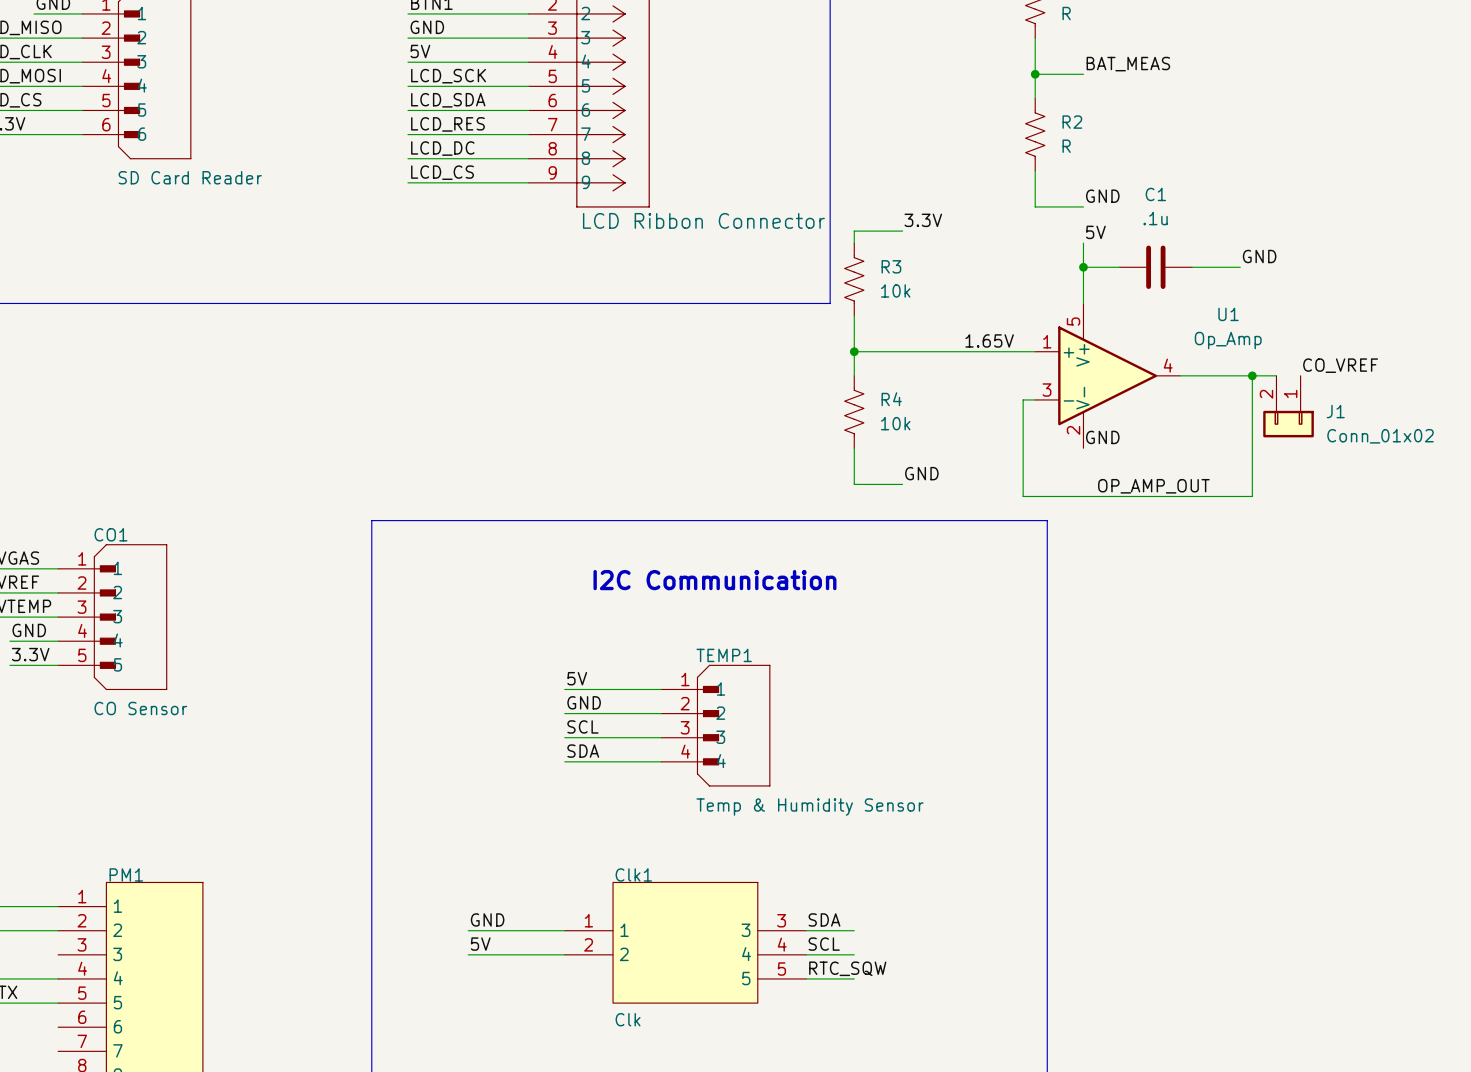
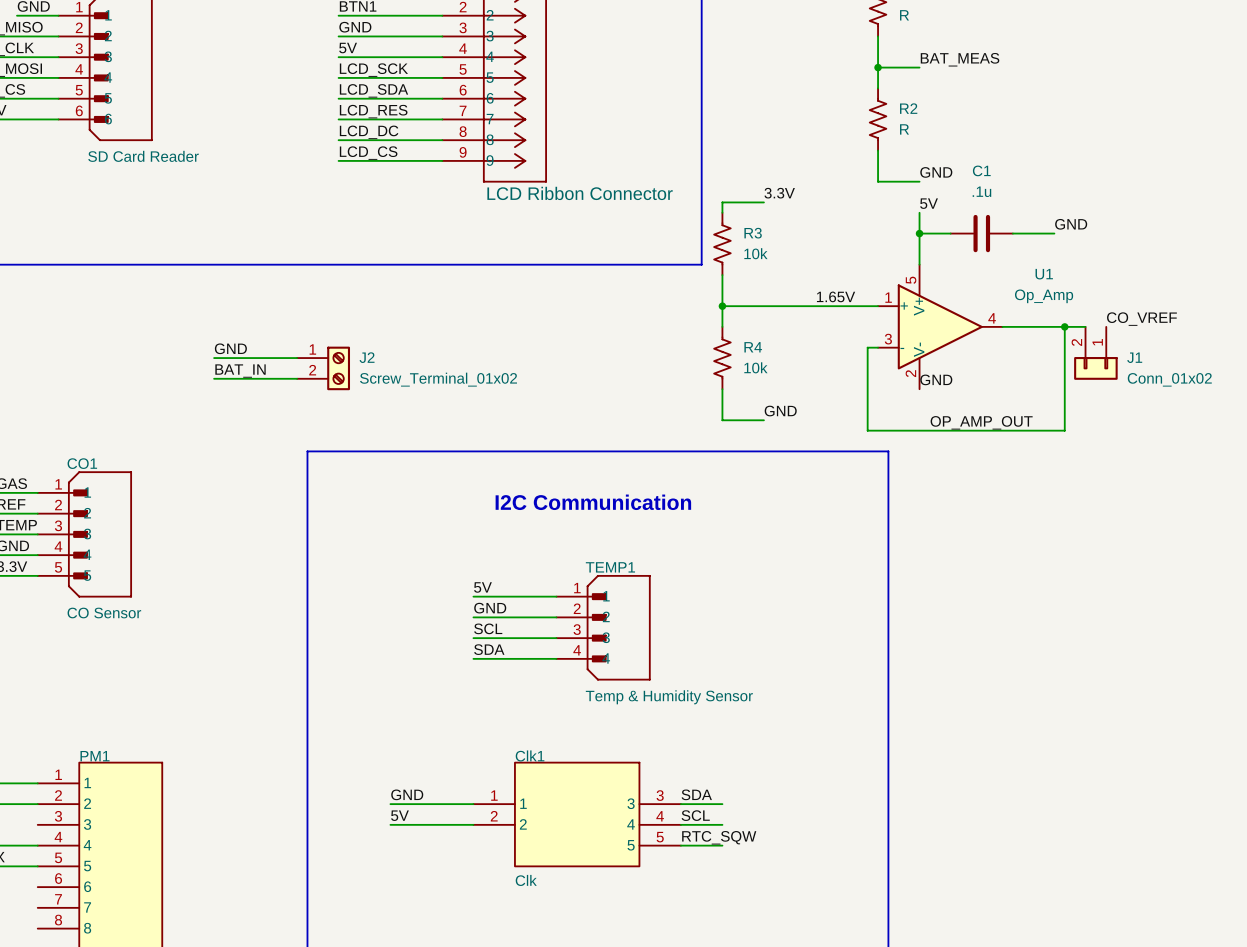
label: none -> GND (230, 348)
wire: none -> (214, 358) (297, 358)
J2: none -> Screw_Terminal_01x02 (323, 368)
label: none -> BAT_IN (240, 371)
wire: none -> (214, 378) (297, 378)

